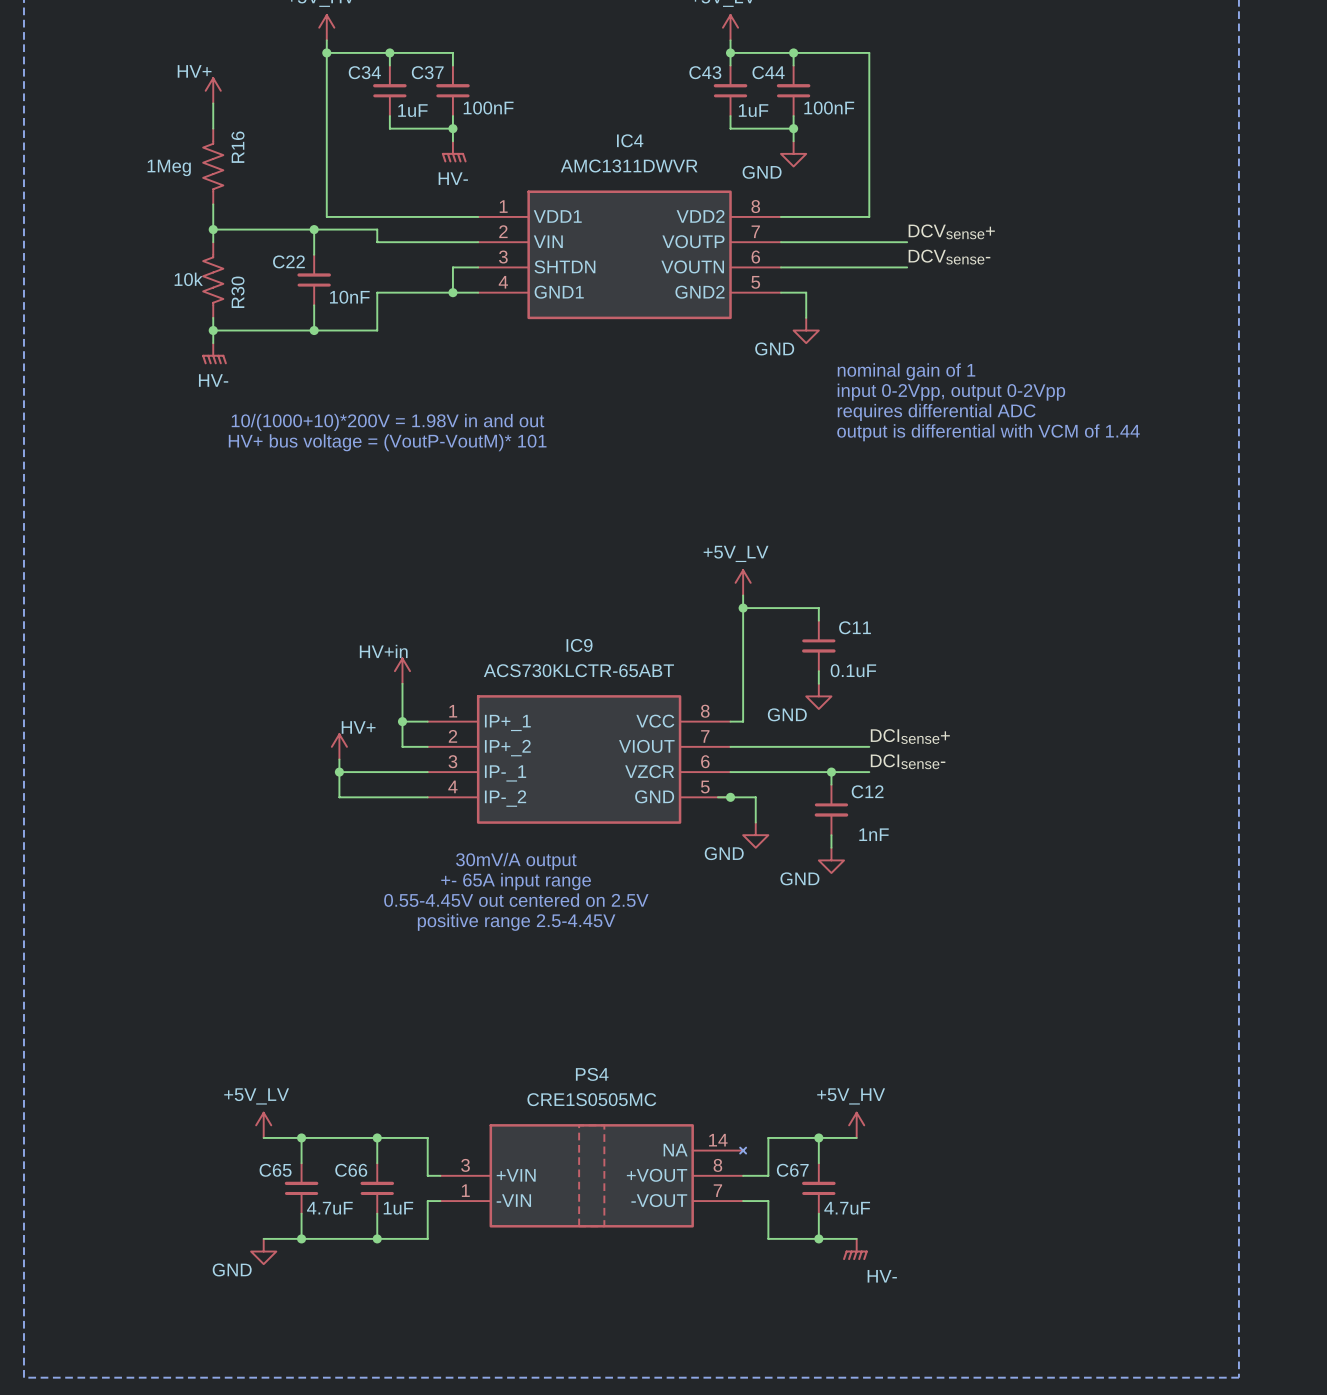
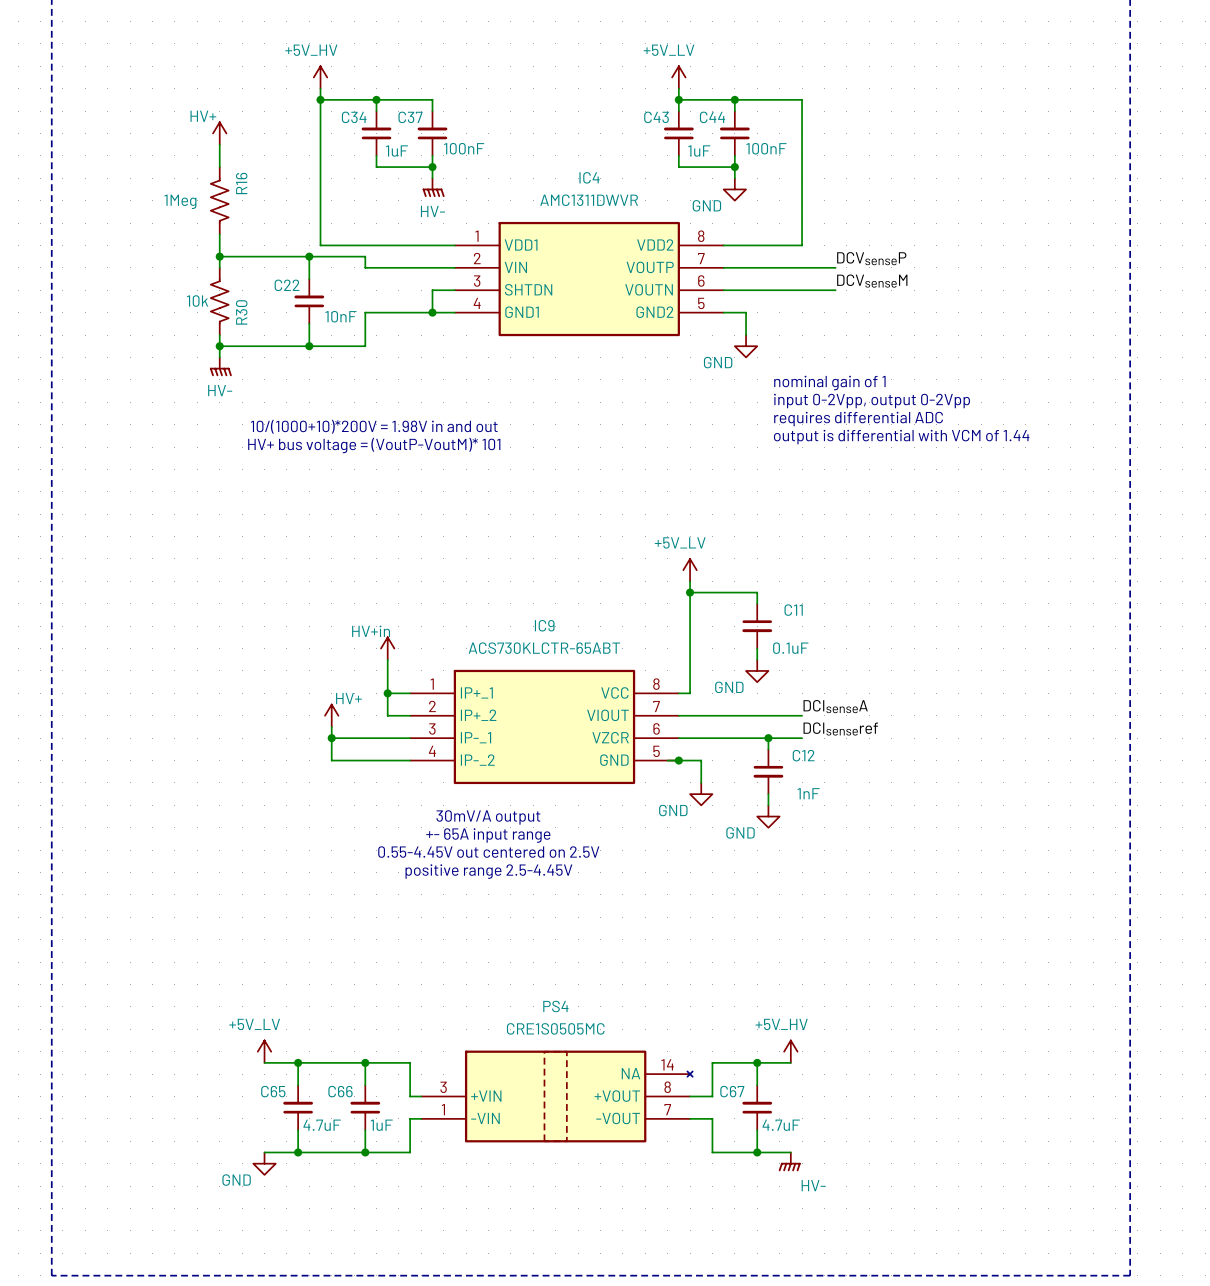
label: DCVsense+ (951, 231) -> DCVsenseP (871, 258)
label: DCVsense- (949, 257) -> DCVsenseM (872, 281)
label: DCIsense+ (910, 736) -> DCIsenseA (835, 706)
label: DCIsense- (908, 761) -> DCIsenseref (840, 728)

